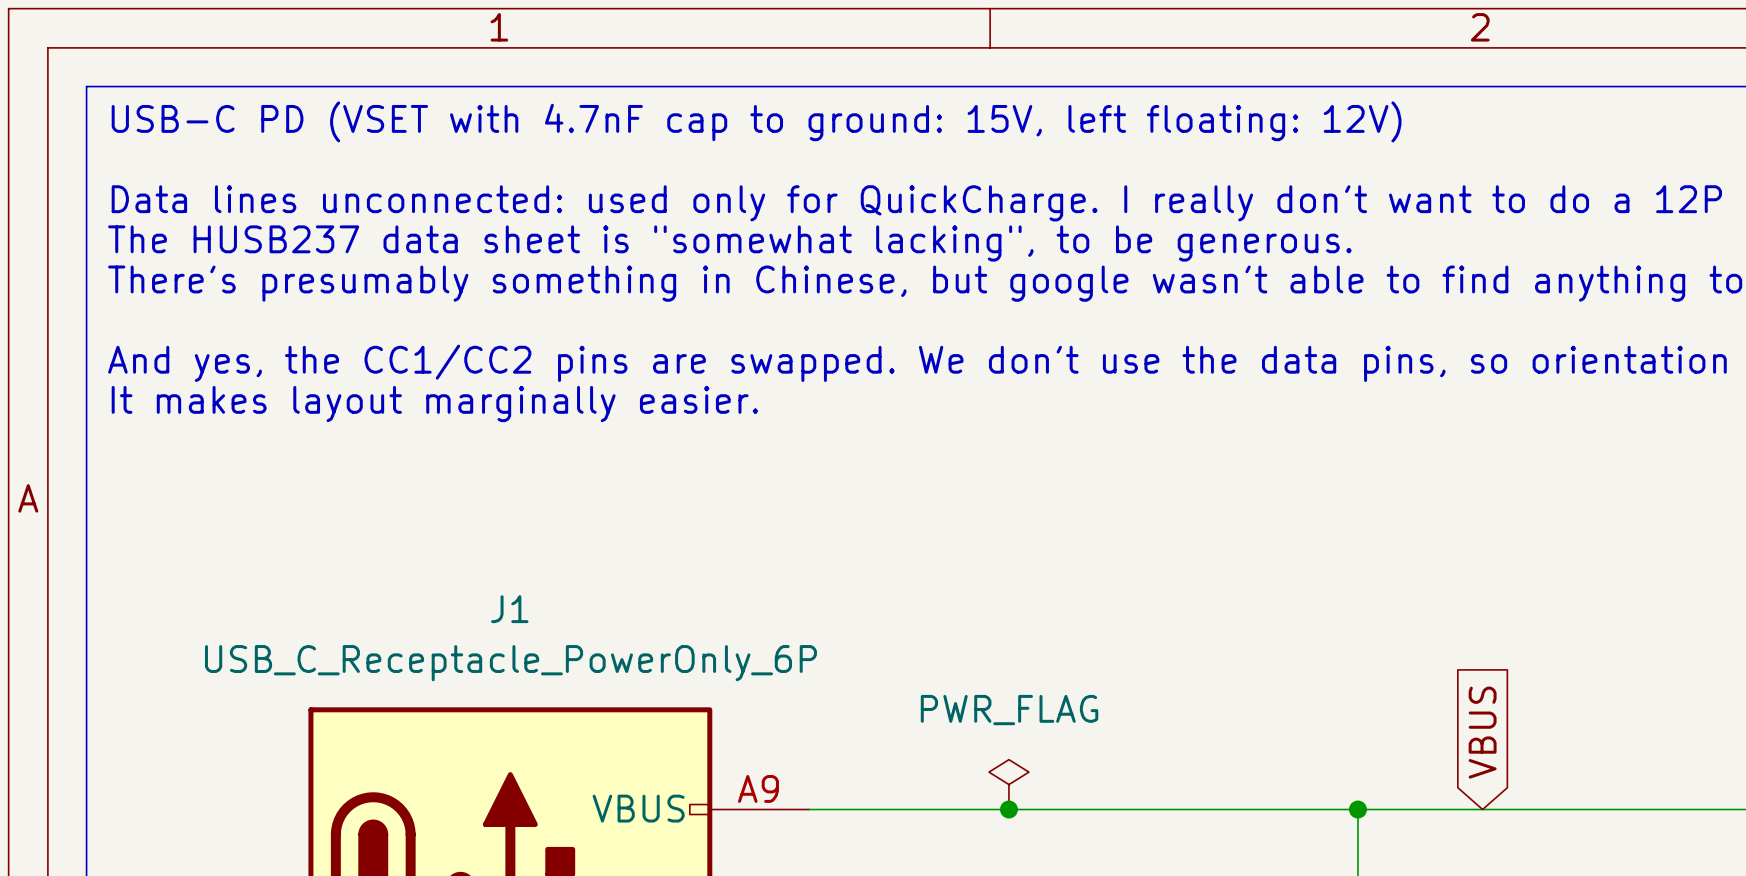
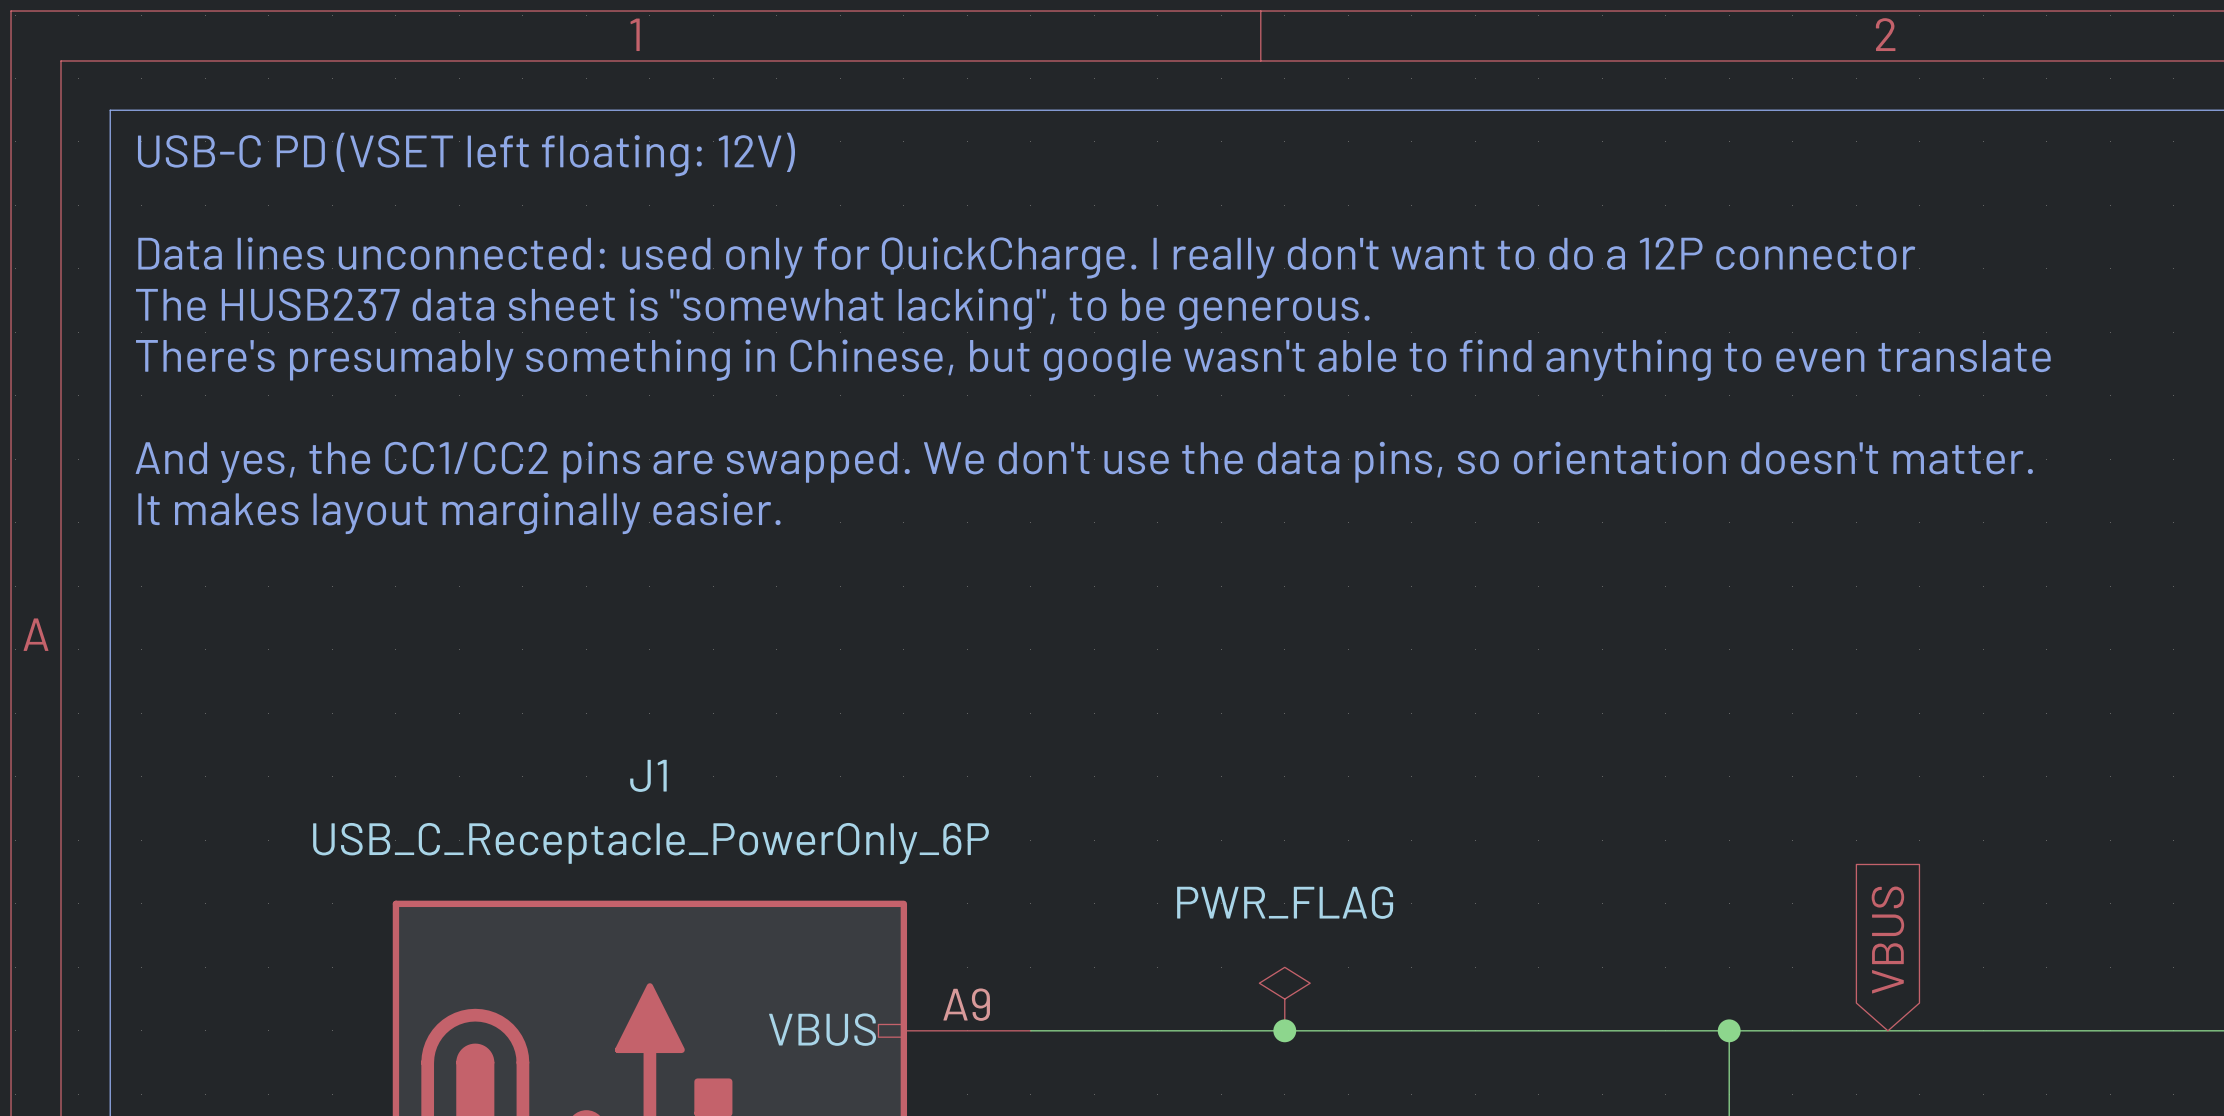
text: USB-C PD (VSET with 4.7nF cap to ground: 15V, left floating: 12V) (756, 121) -> USB-C PD (VSET left floating: 12V) (466, 154)

